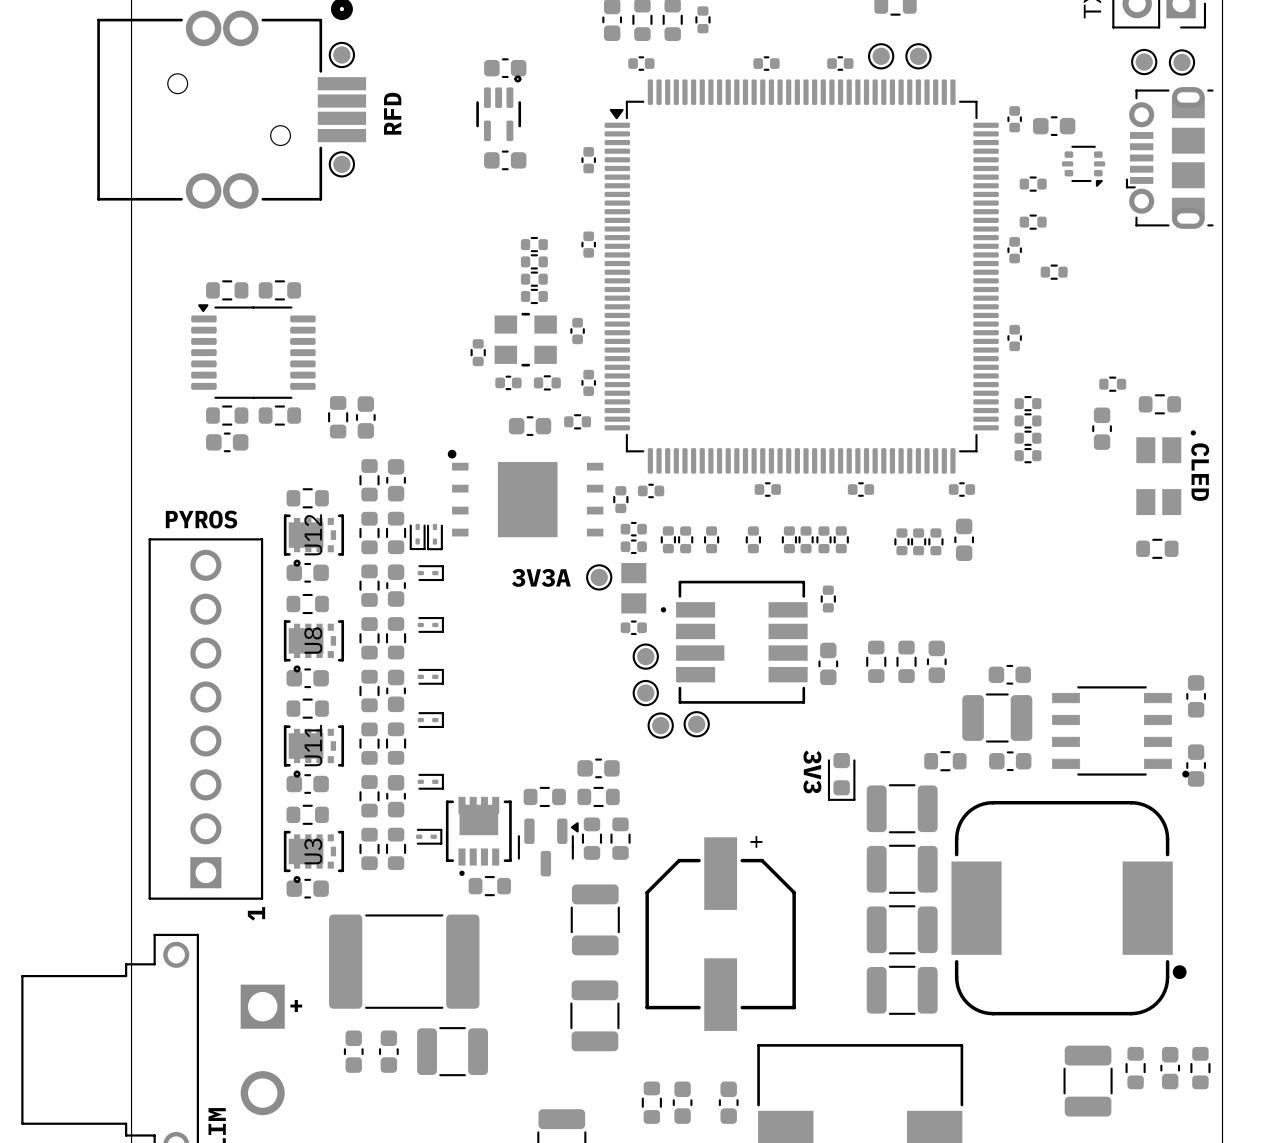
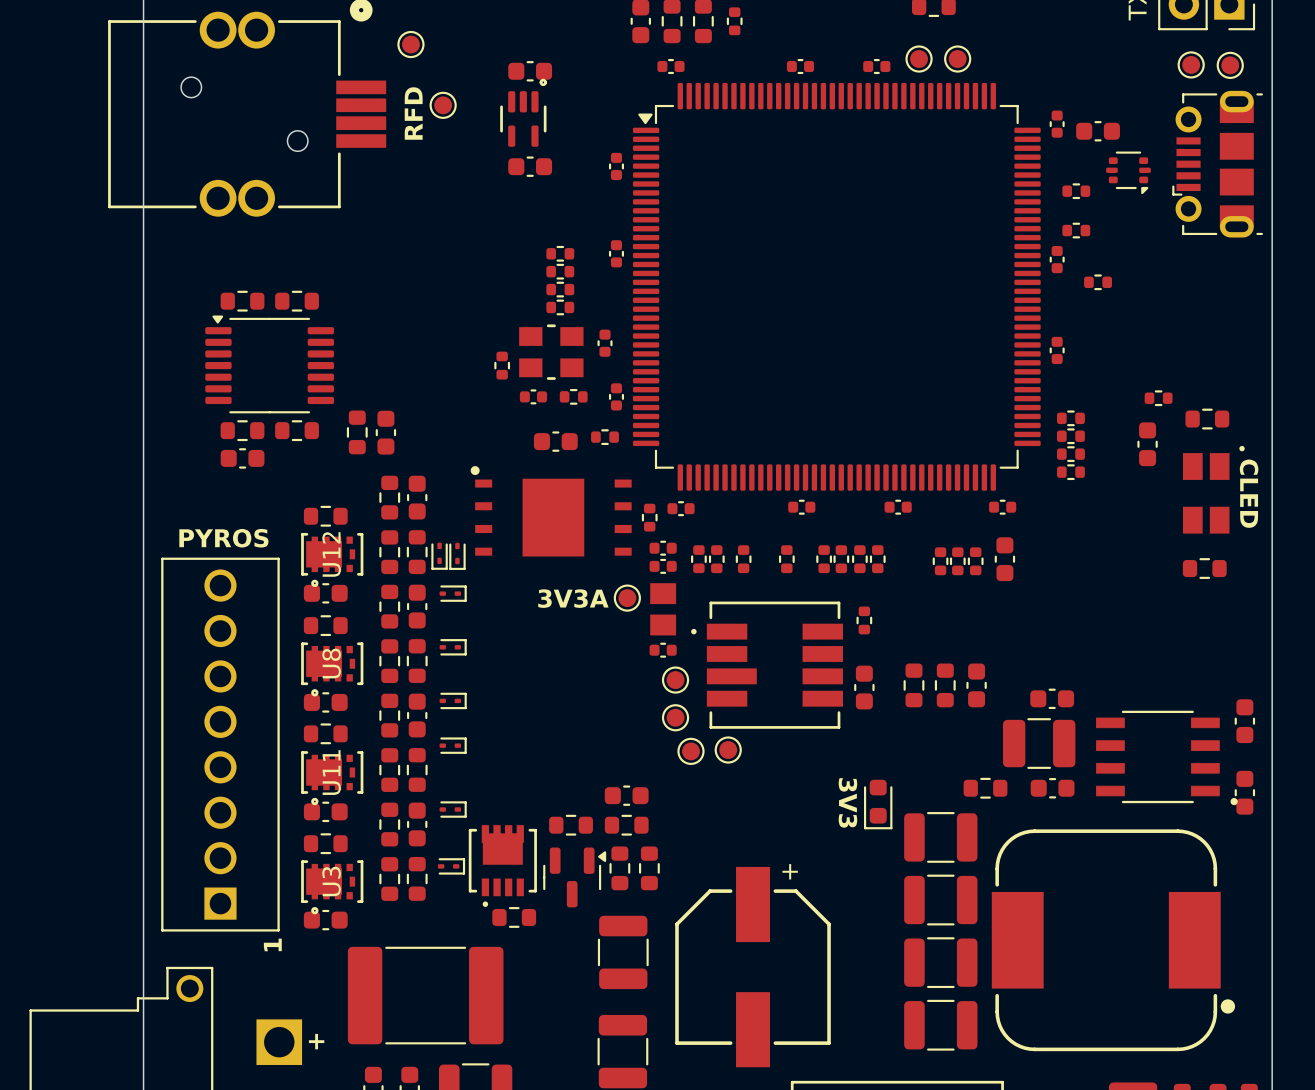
part: none -> (410, 44)
part: (341, 54) -> none
part: none -> (443, 105)
part: (341, 164) -> none

